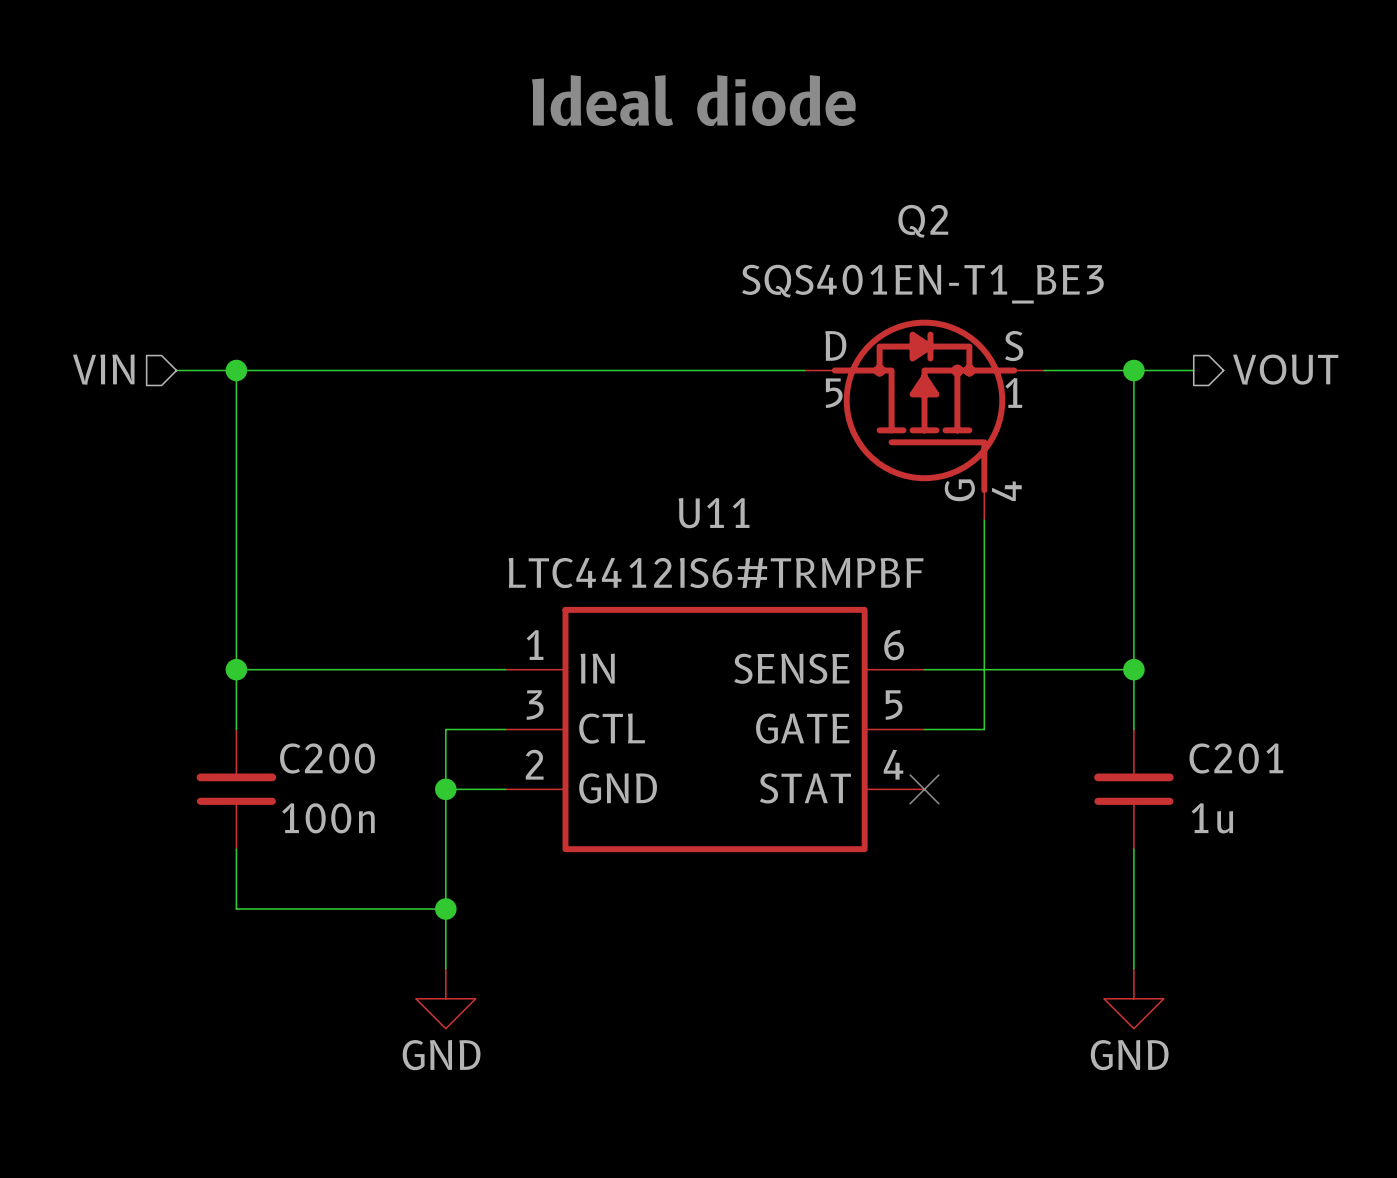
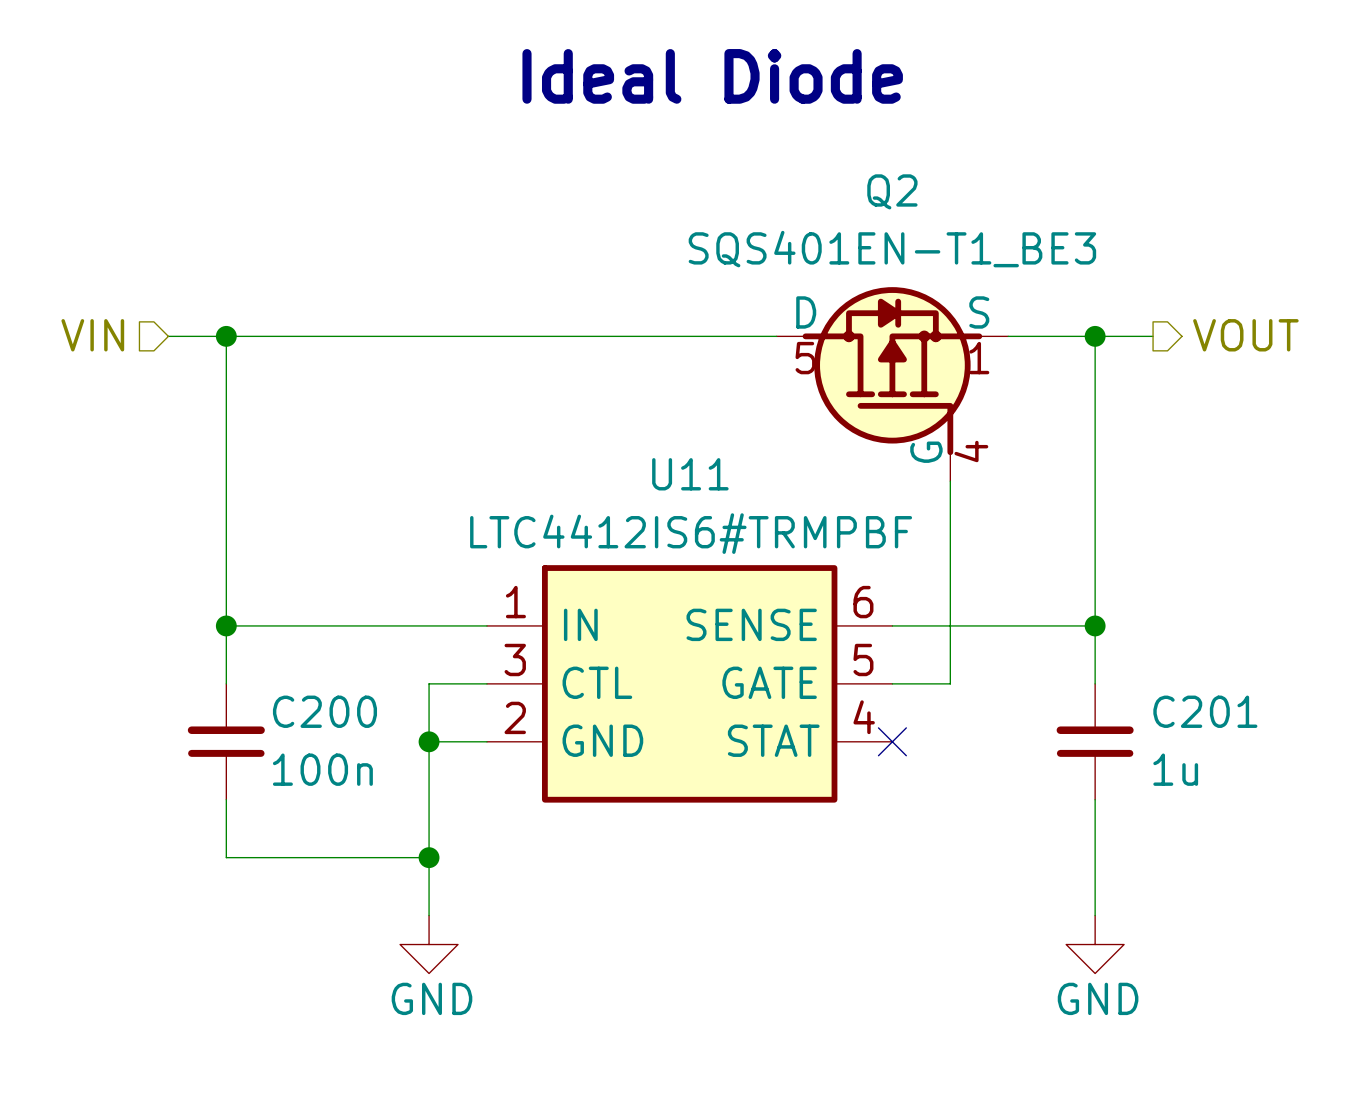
text: Ideal diode (693, 100) -> Ideal Diode (712, 76)

